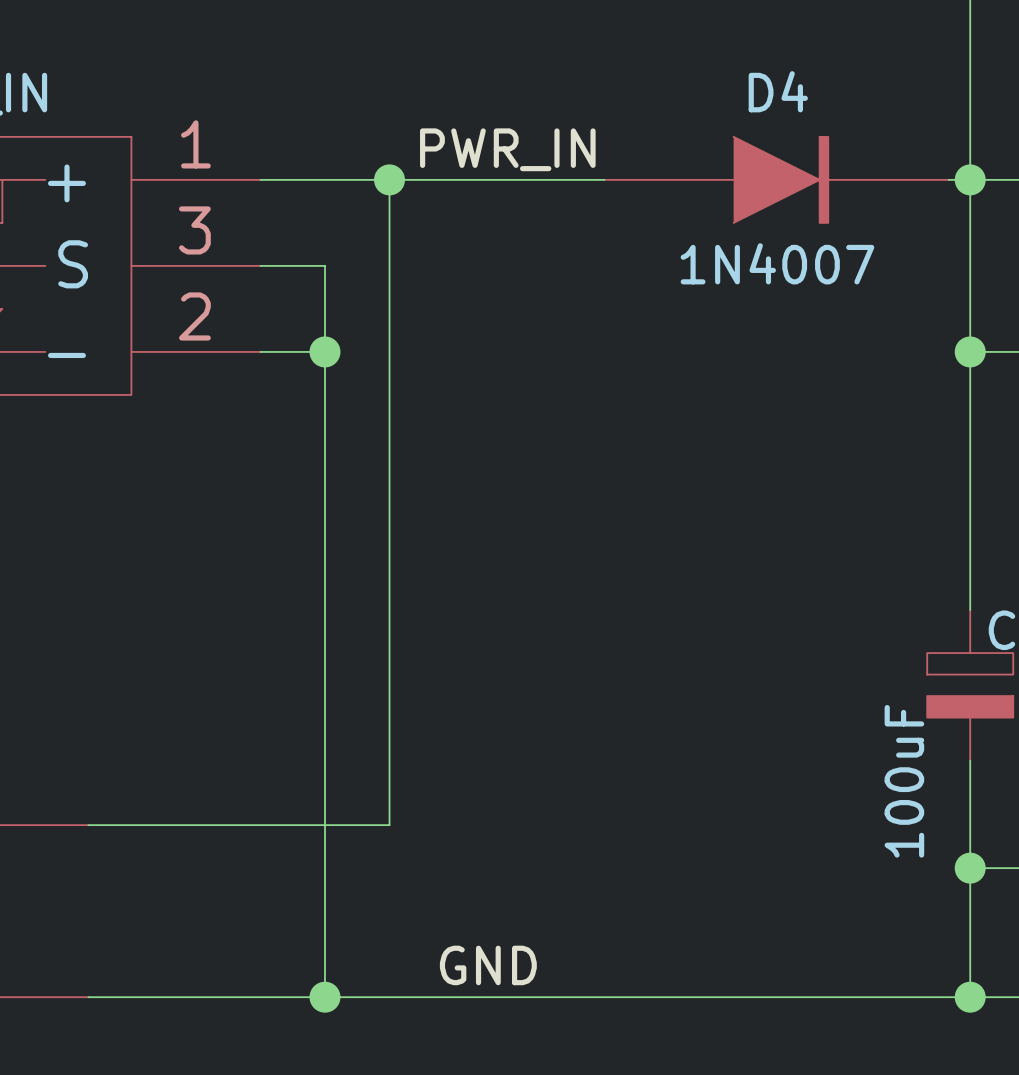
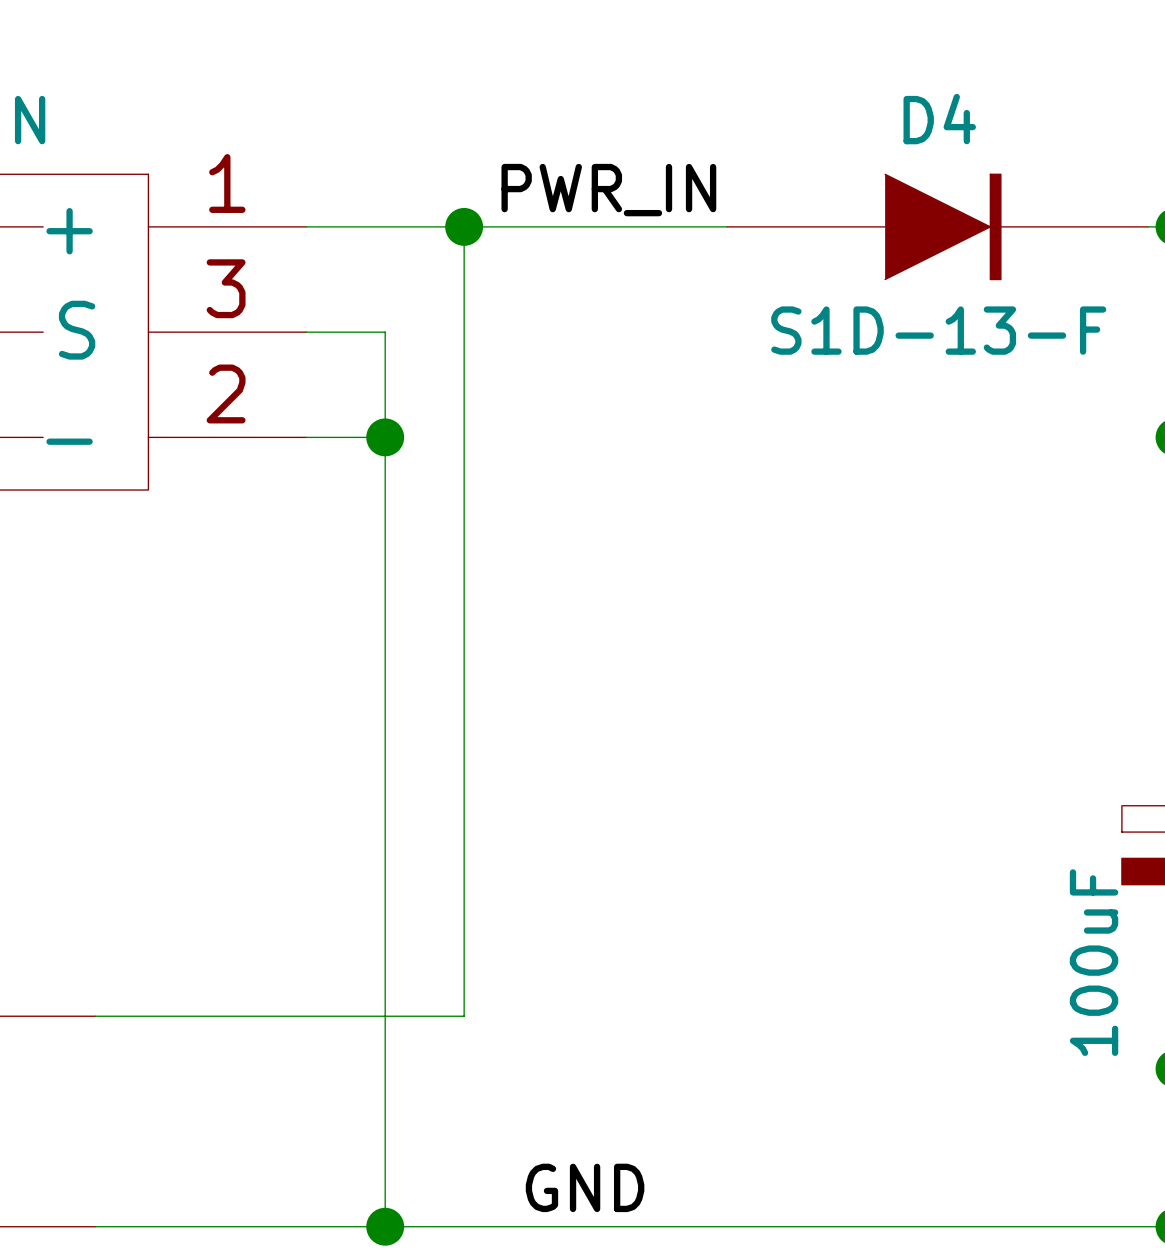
D4 value: 1N4007 (777, 263) -> S1D-13-F (938, 330)

